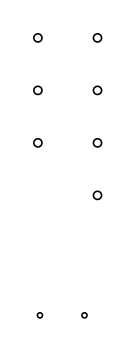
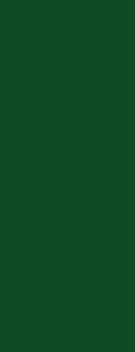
part: (37, 37) -> none
part: (97, 37) -> none
part: (37, 90) -> none
part: (97, 90) -> none
part: (37, 142) -> none
part: (97, 142) -> none
part: (97, 195) -> none
part: (39, 315) -> none
part: (84, 315) -> none

